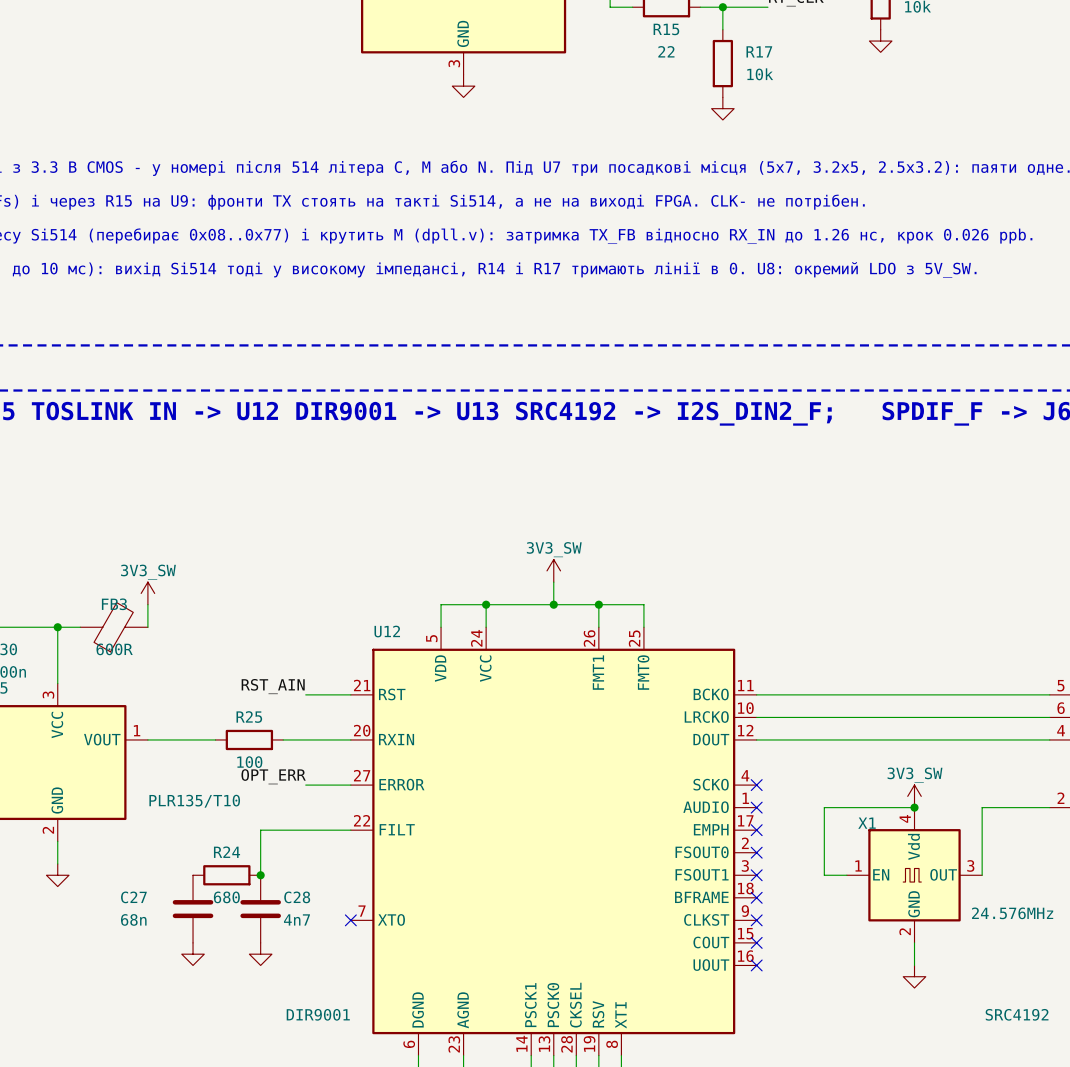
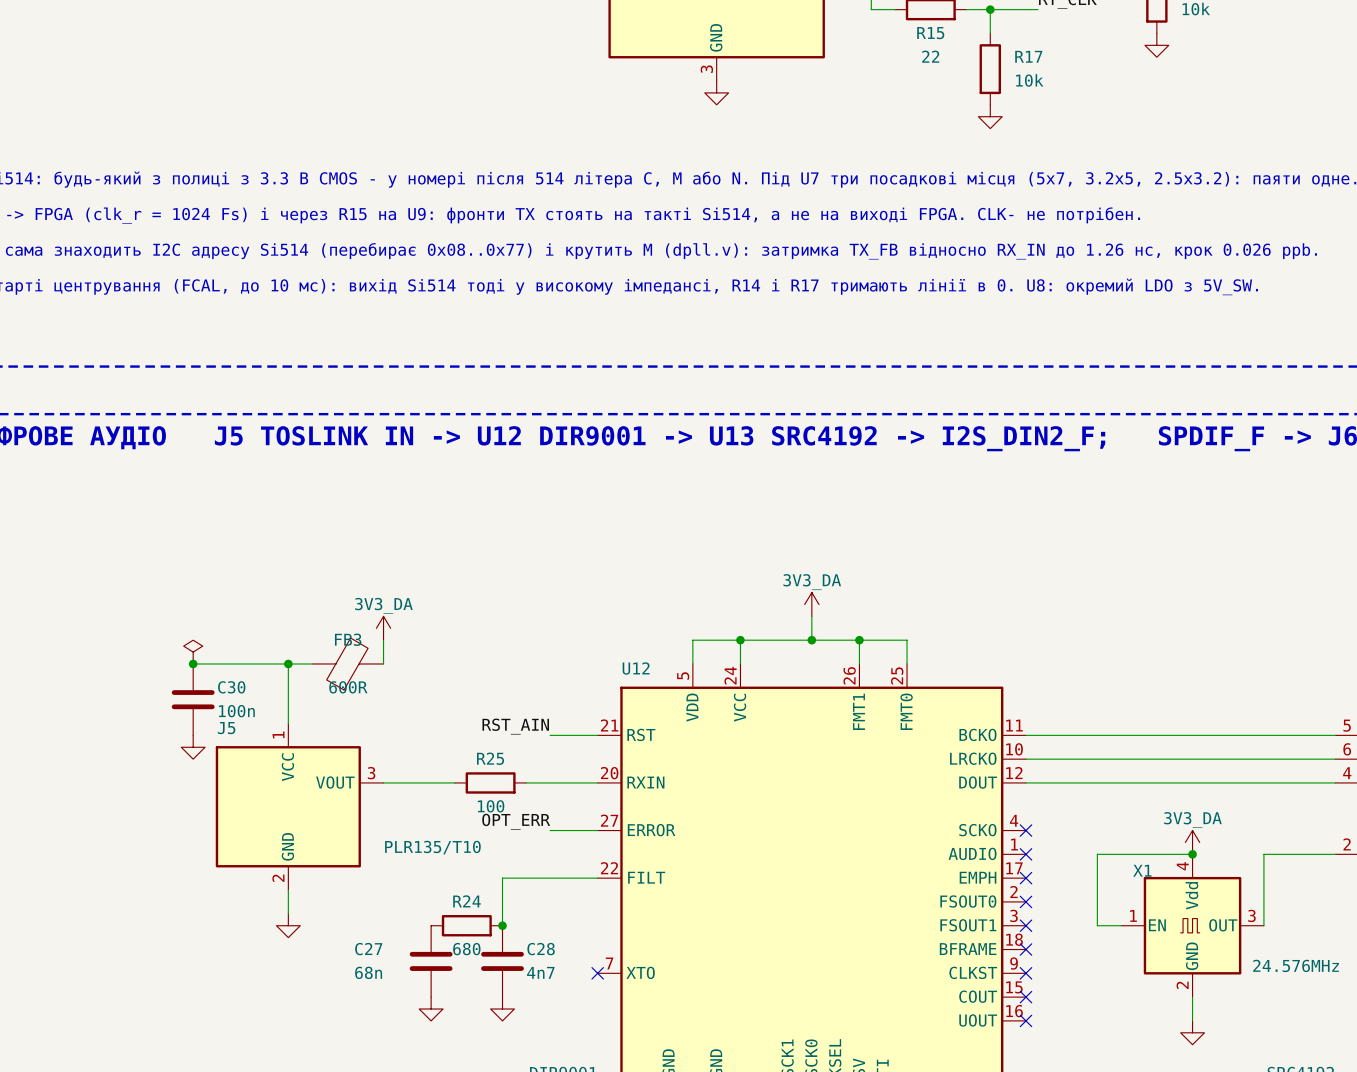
power symbol: 3V3_SW (553, 570) -> 3V3_DA (811, 604)
power symbol: 3V3_SW (147, 593) -> 3V3_DA (383, 628)
J5 pin number: 3 (48, 694) -> 1 (278, 734)
J5 pin number: 1 (137, 730) -> 3 (371, 773)
power symbol: 3V3_SW (914, 796) -> 3V3_DA (1192, 842)

